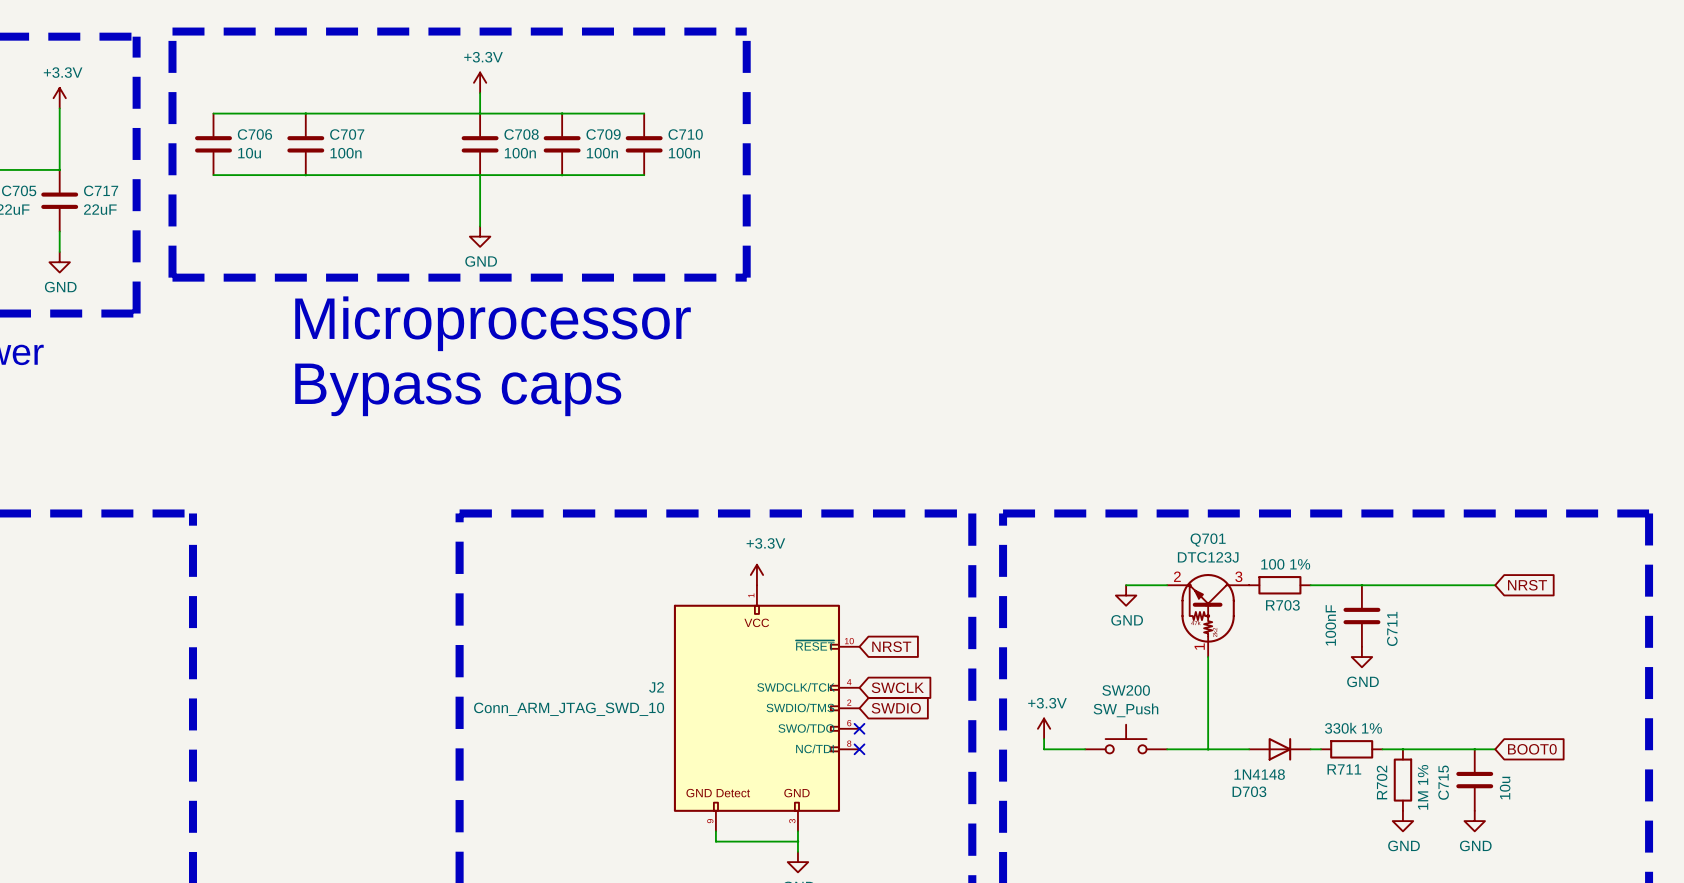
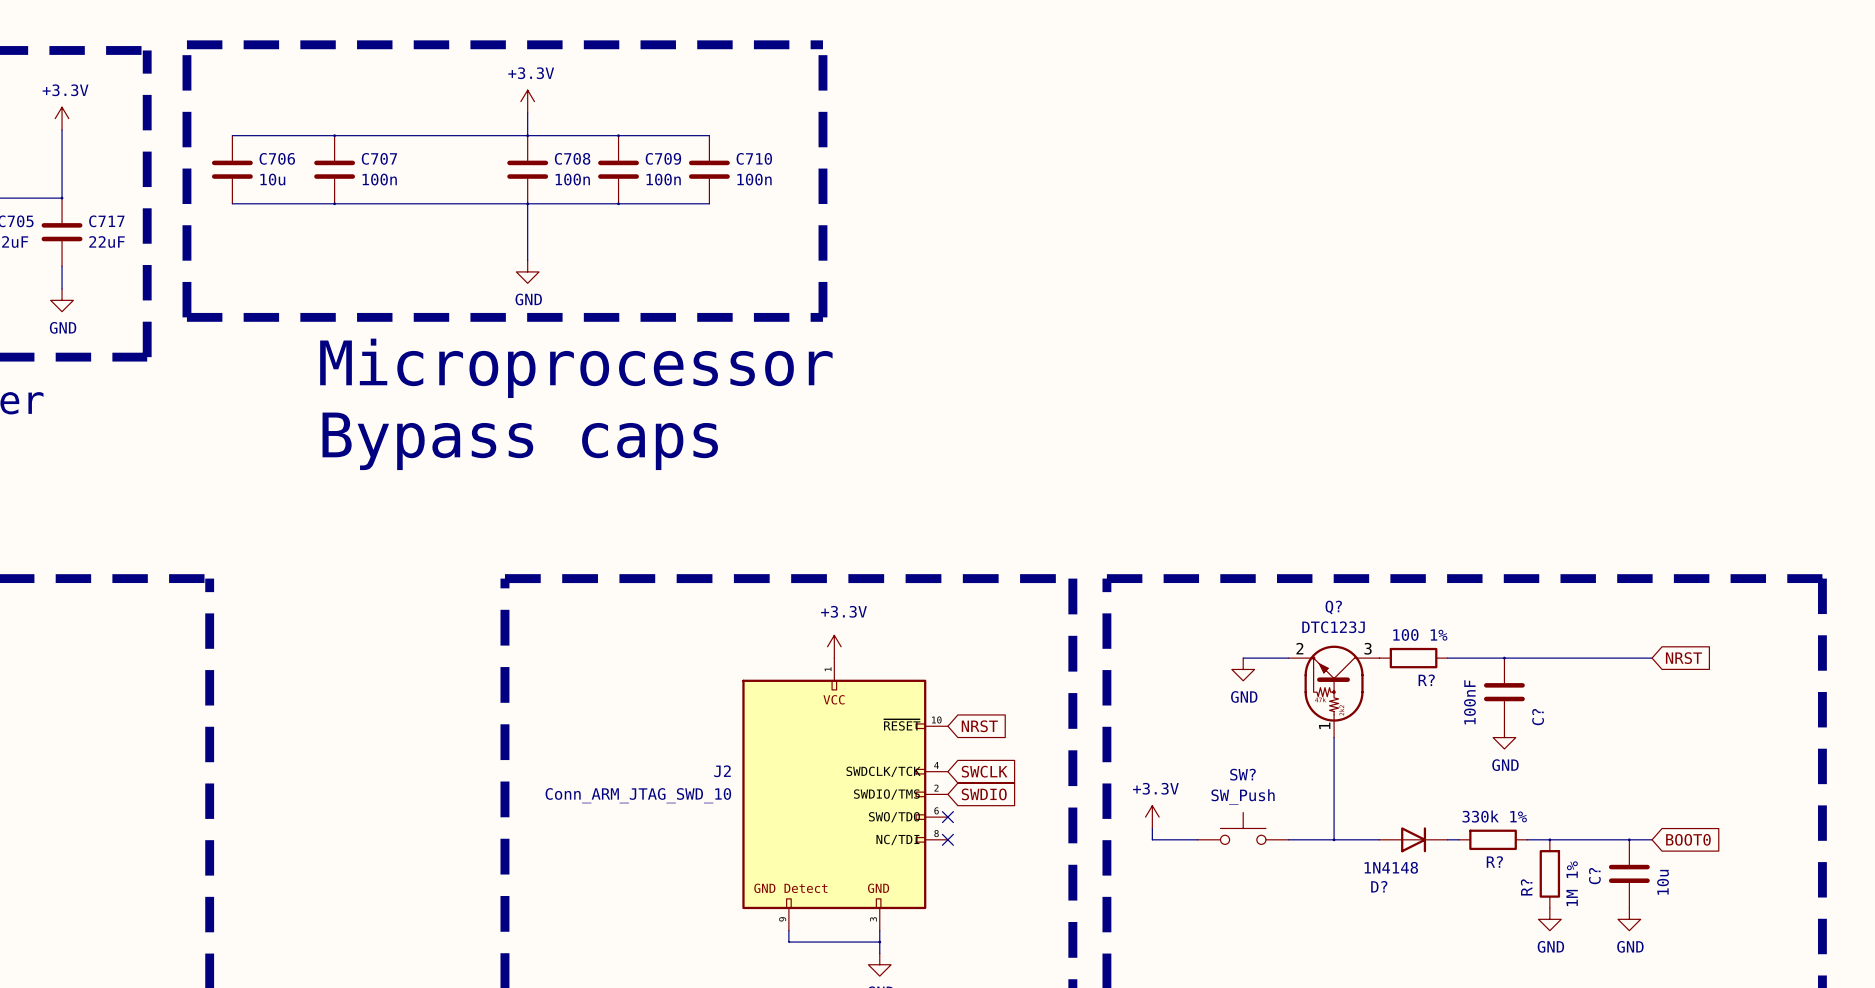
Q701 name: Q701 (1208, 540) -> Q? (1333, 607)
R703 name: R703 (1282, 605) -> R? (1426, 680)
C711 name: C711 (1392, 628) -> C? (1538, 717)
SW200 name: SW200 (1126, 690) -> SW? (1243, 774)
R711 name: R711 (1344, 769) -> R? (1494, 862)
R702 name: R702 (1382, 782) -> R? (1526, 887)
C715 name: C715 (1443, 782) -> C? (1594, 876)
D703 name: D703 (1249, 791) -> D? (1379, 886)

